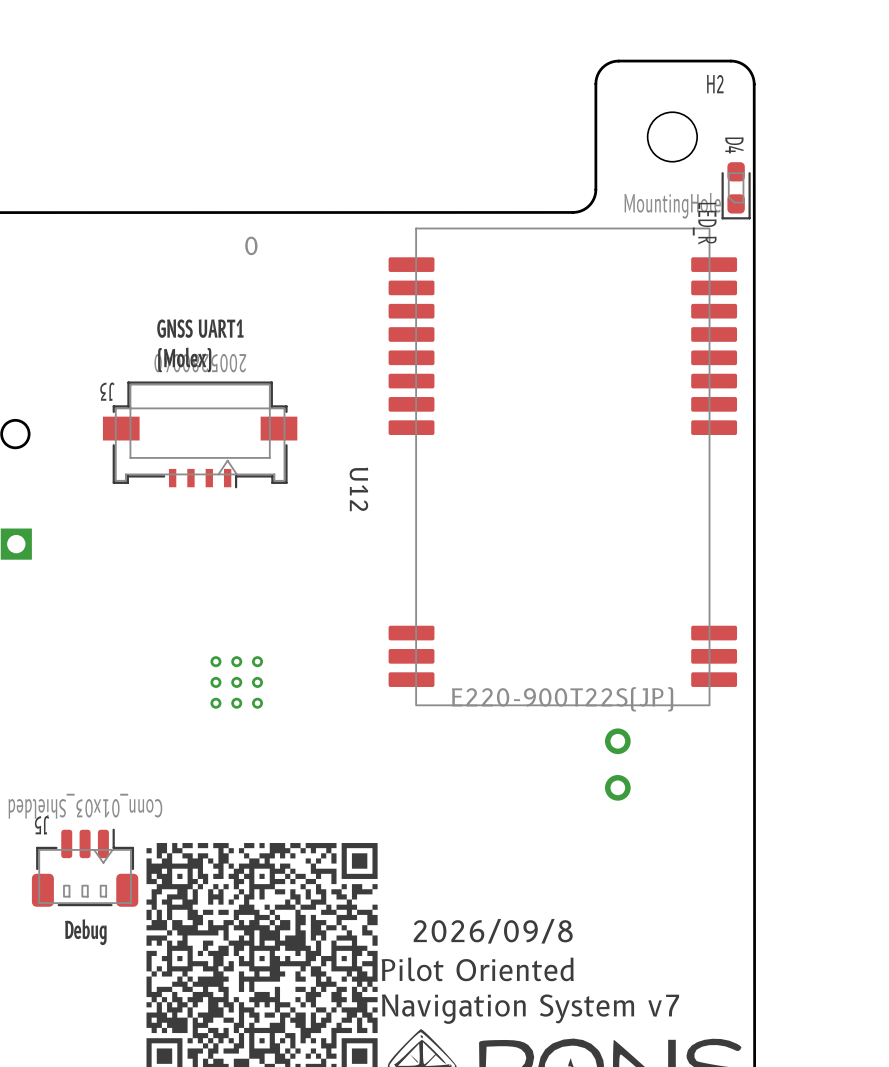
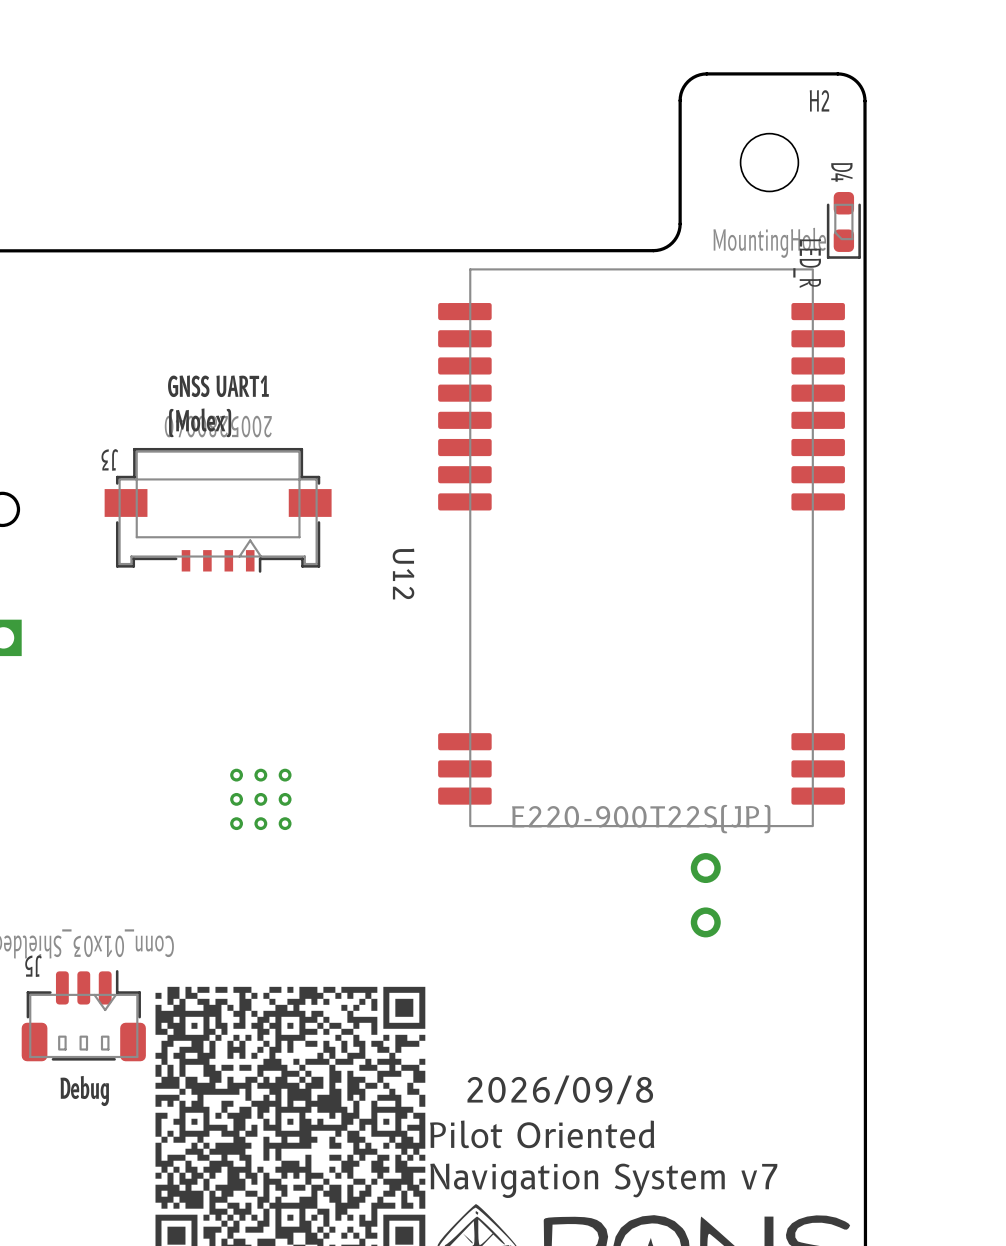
part: 0 (251, 245) -> none

